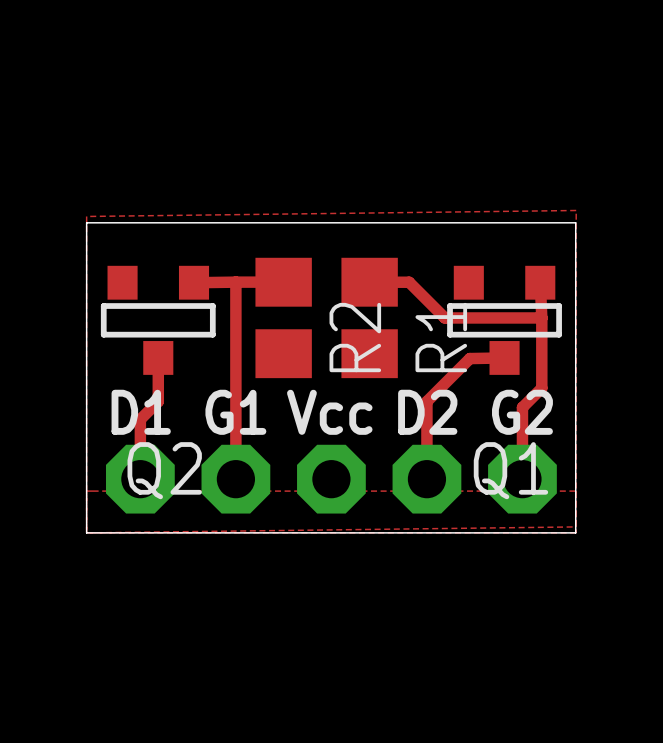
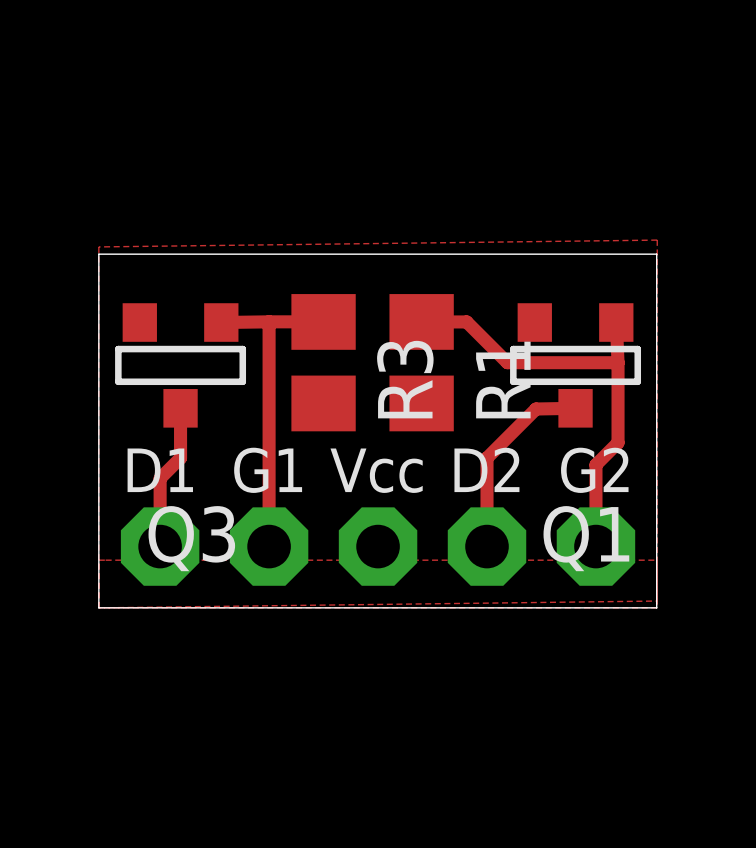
R2 name: R2 (355, 337) -> R3 (405, 379)
Q2 name: Q2 (164, 470) -> Q3 (191, 538)

